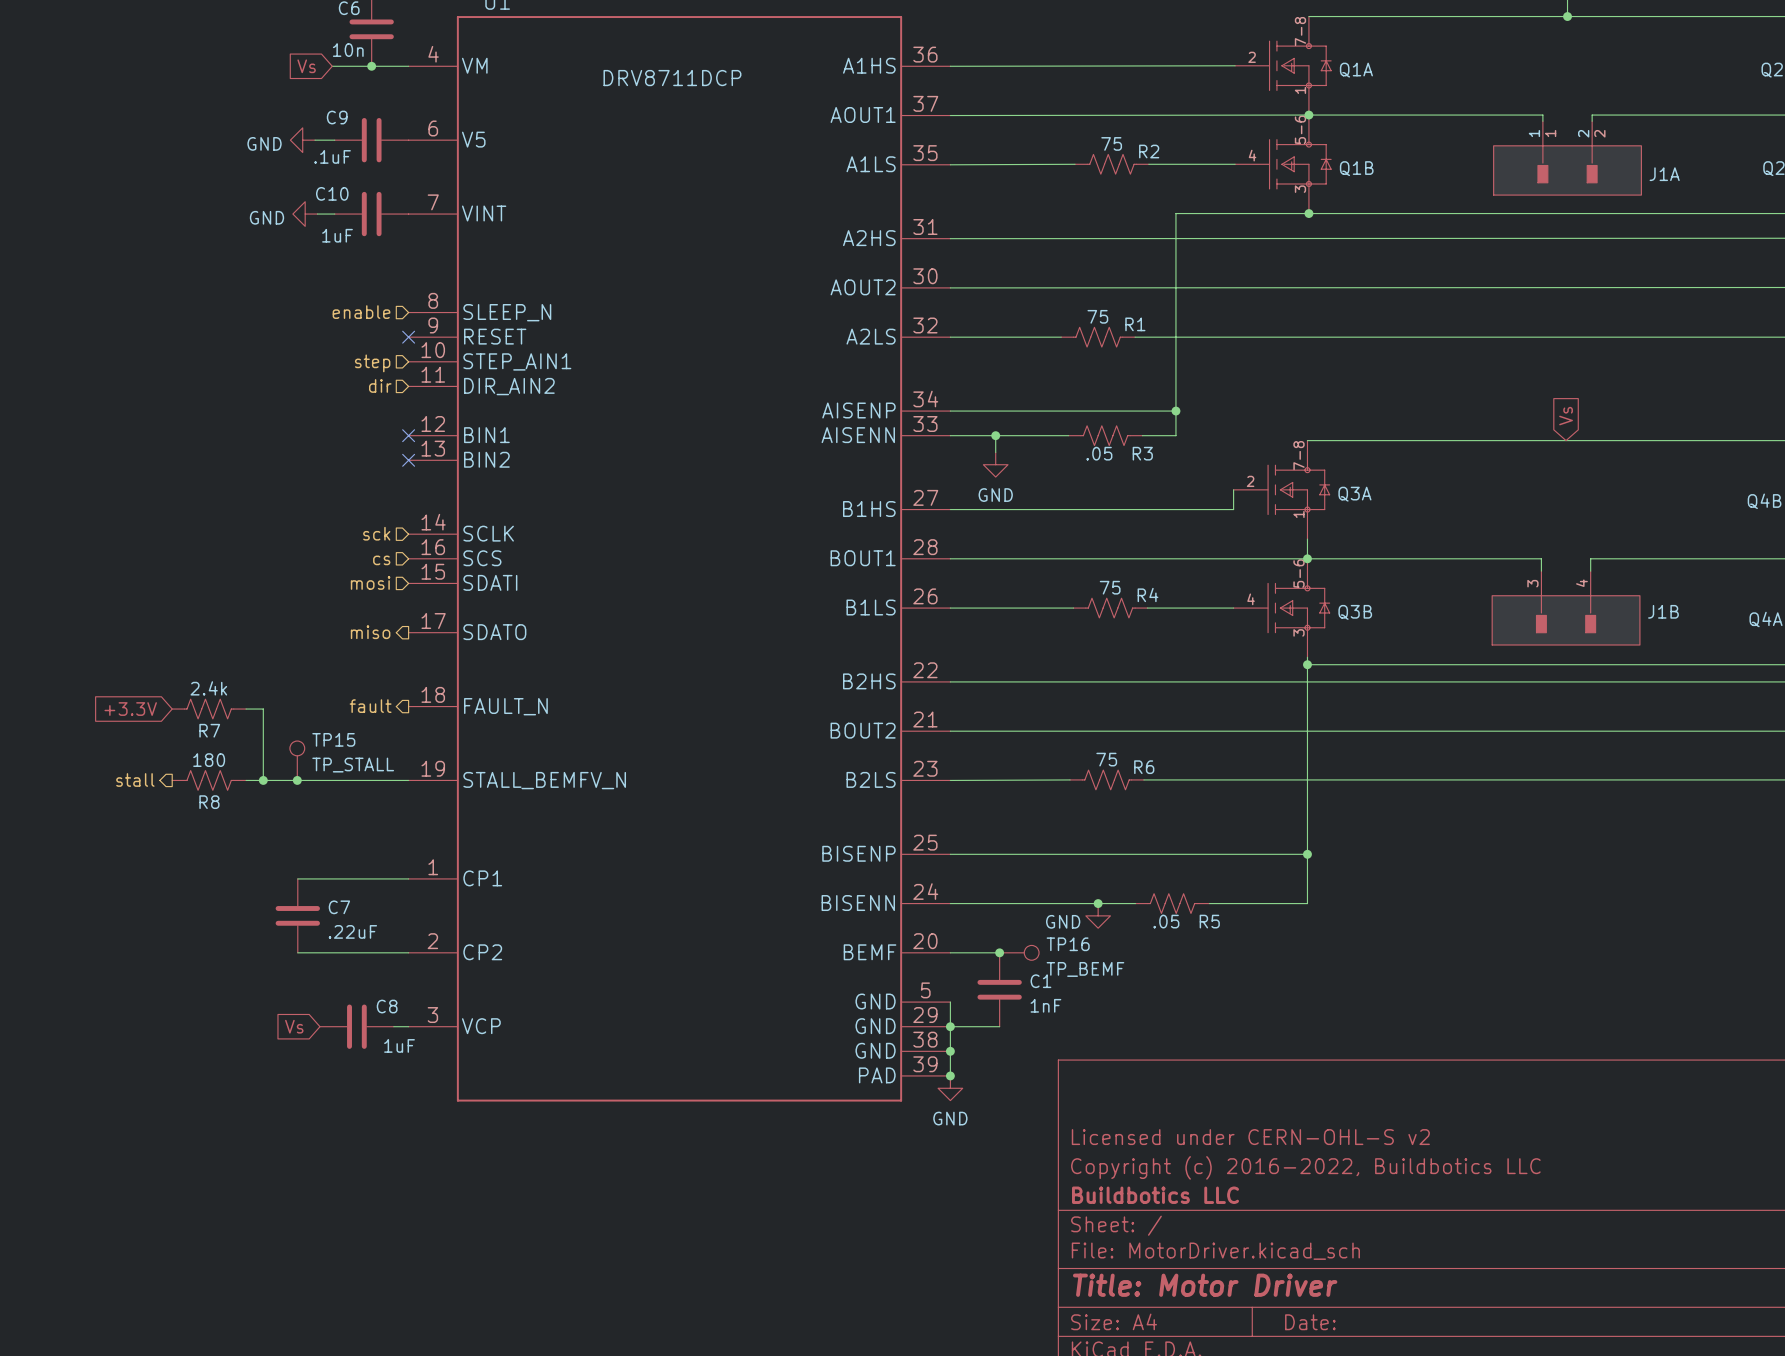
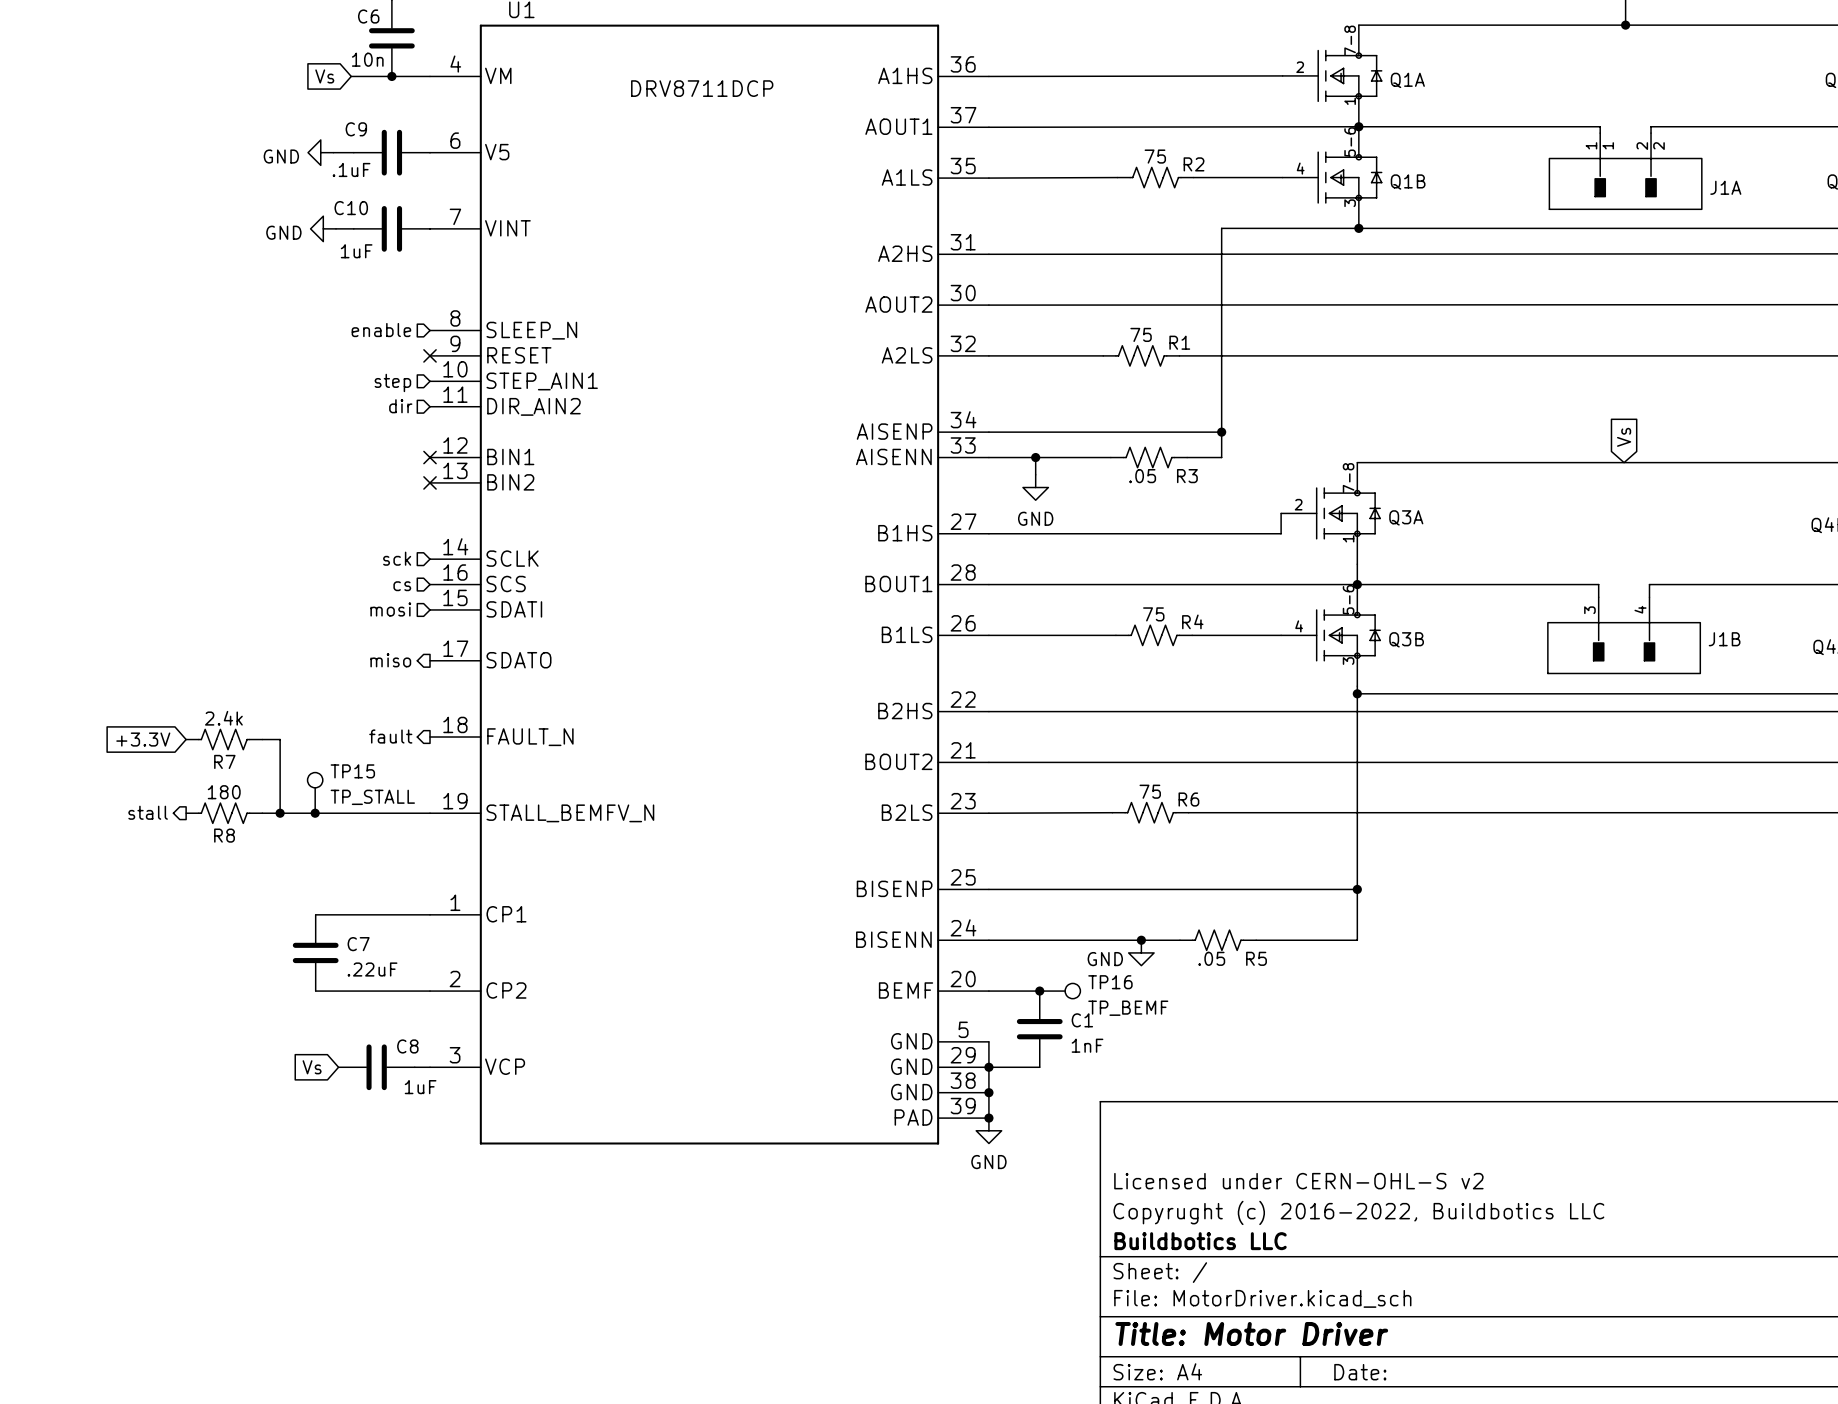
title block: Copyright (c) 2016-2022, Buildbotics LLC (1305, 1167) -> Copyrught (c) 2016-2022, Buildbotics LLC (1358, 1212)

